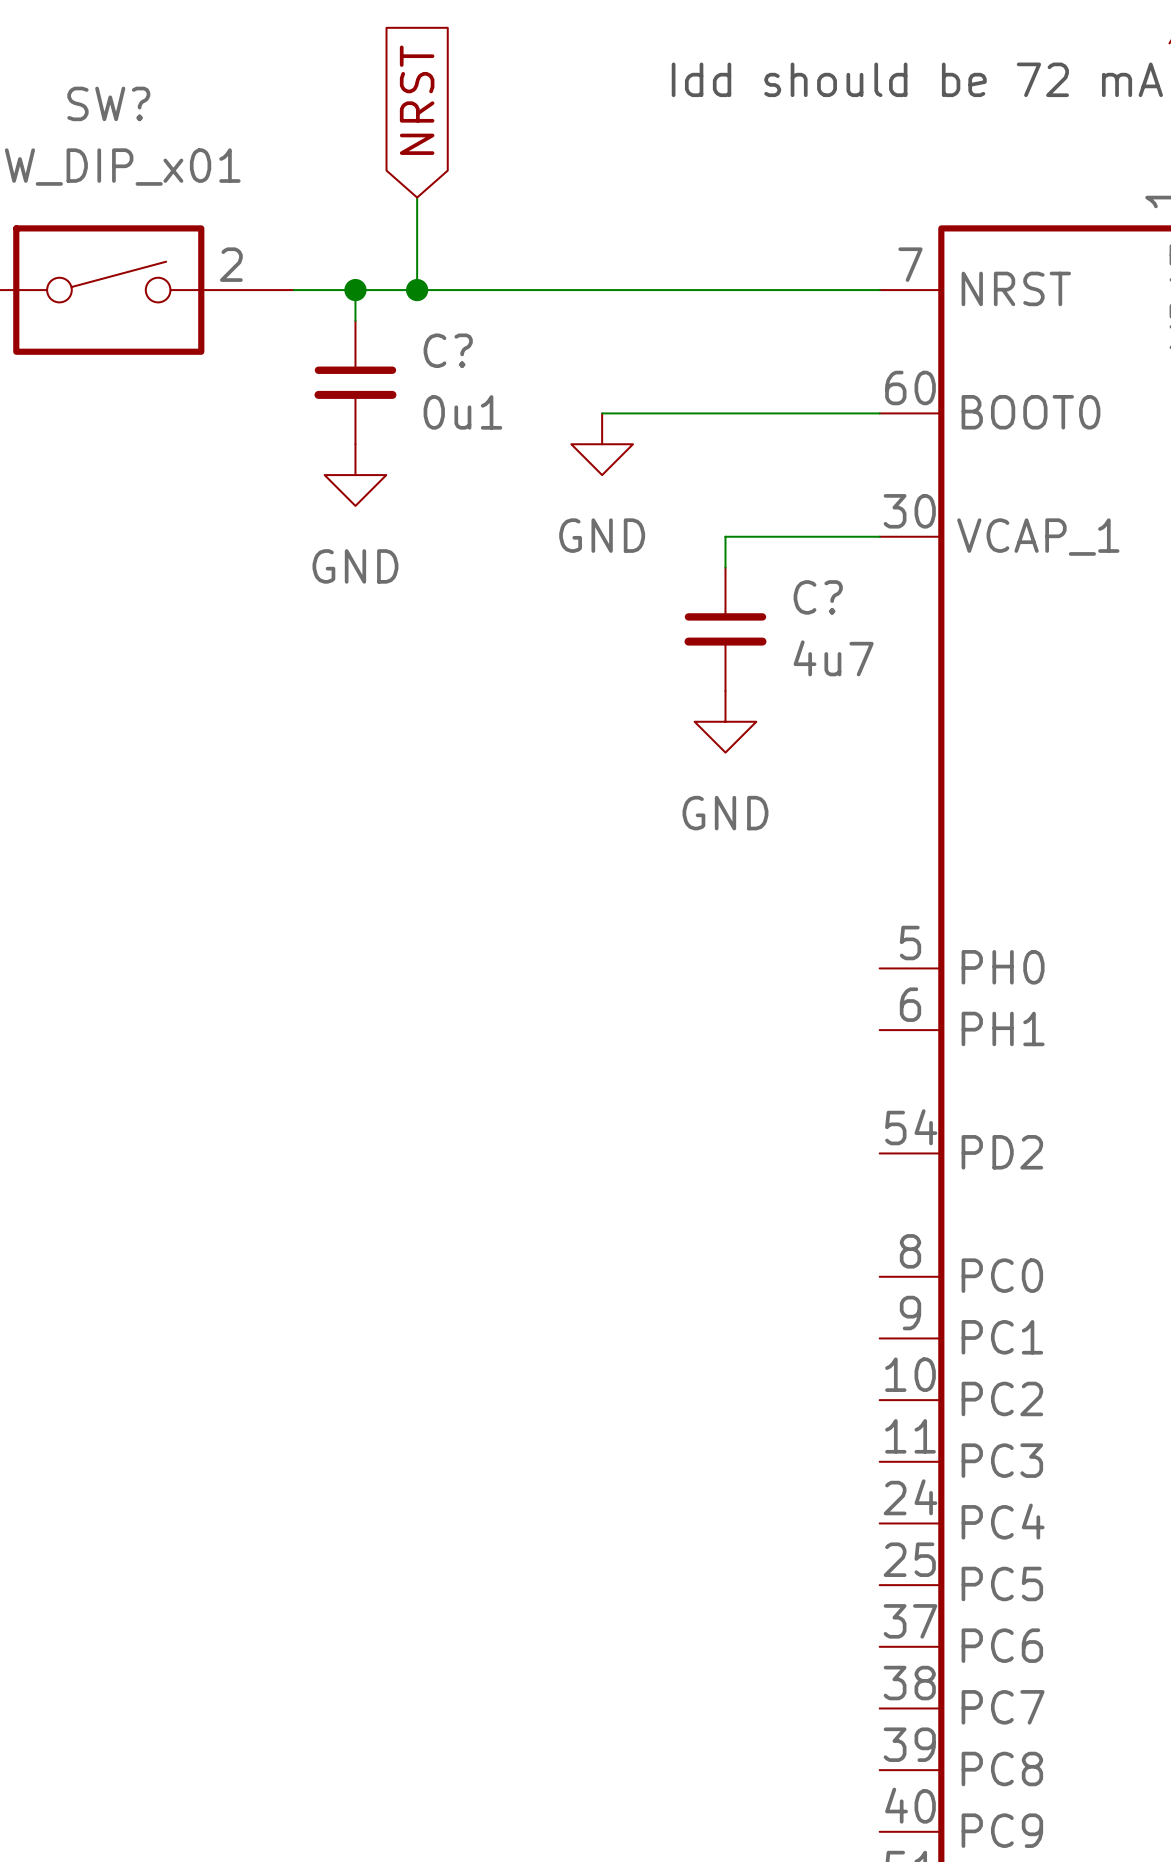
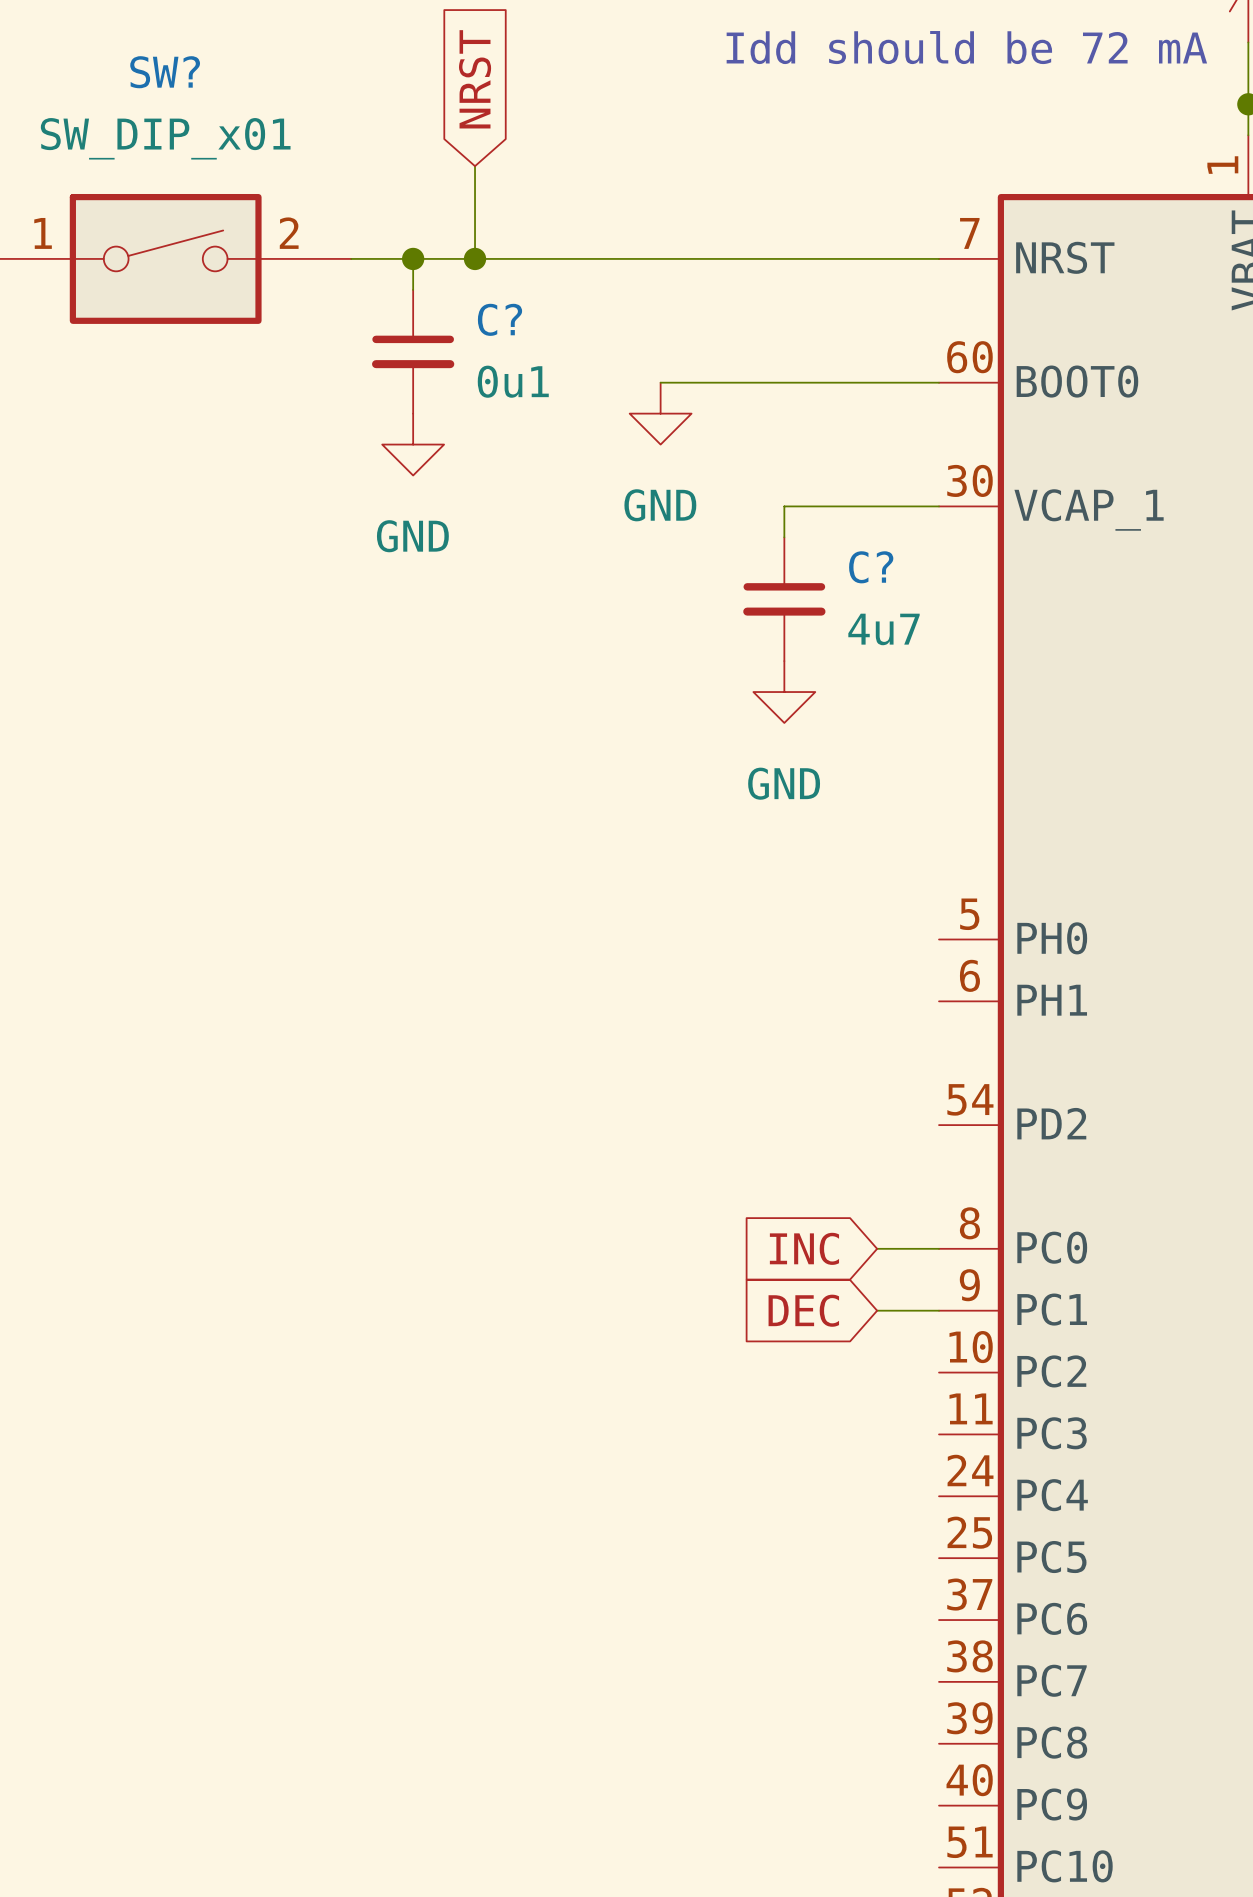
global label: none -> INC (804, 1248)
wire: none -> (877, 1248) (939, 1248)
global label: none -> DEC (803, 1310)
wire: none -> (877, 1310) (939, 1310)

